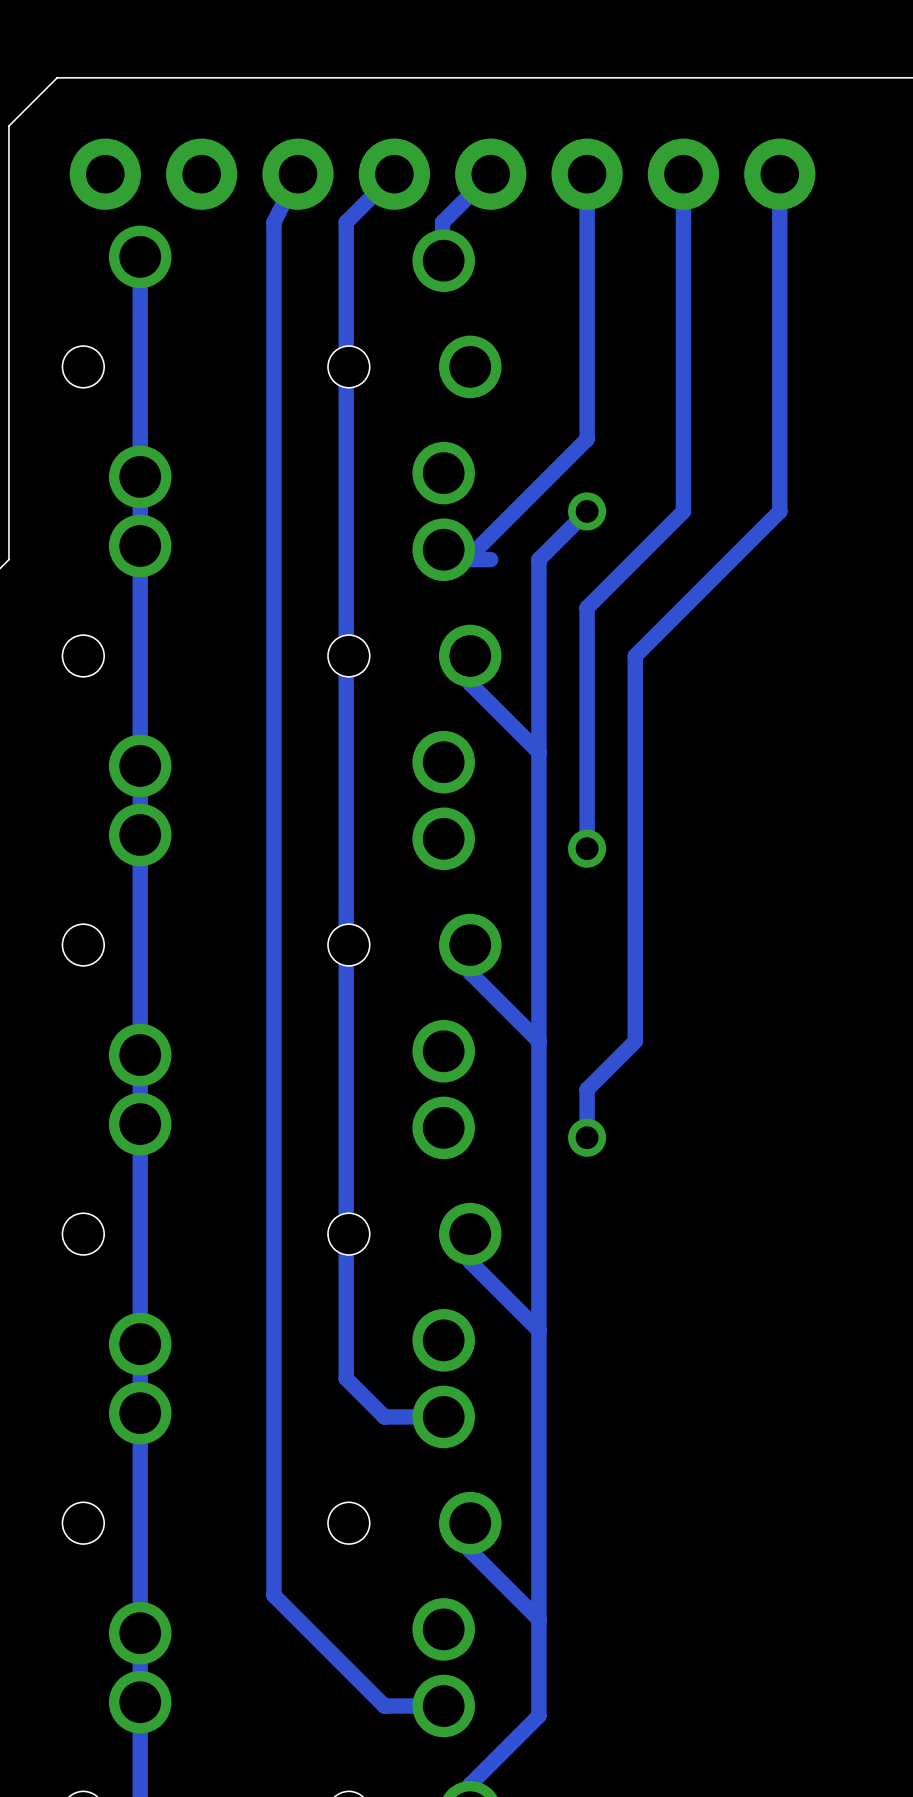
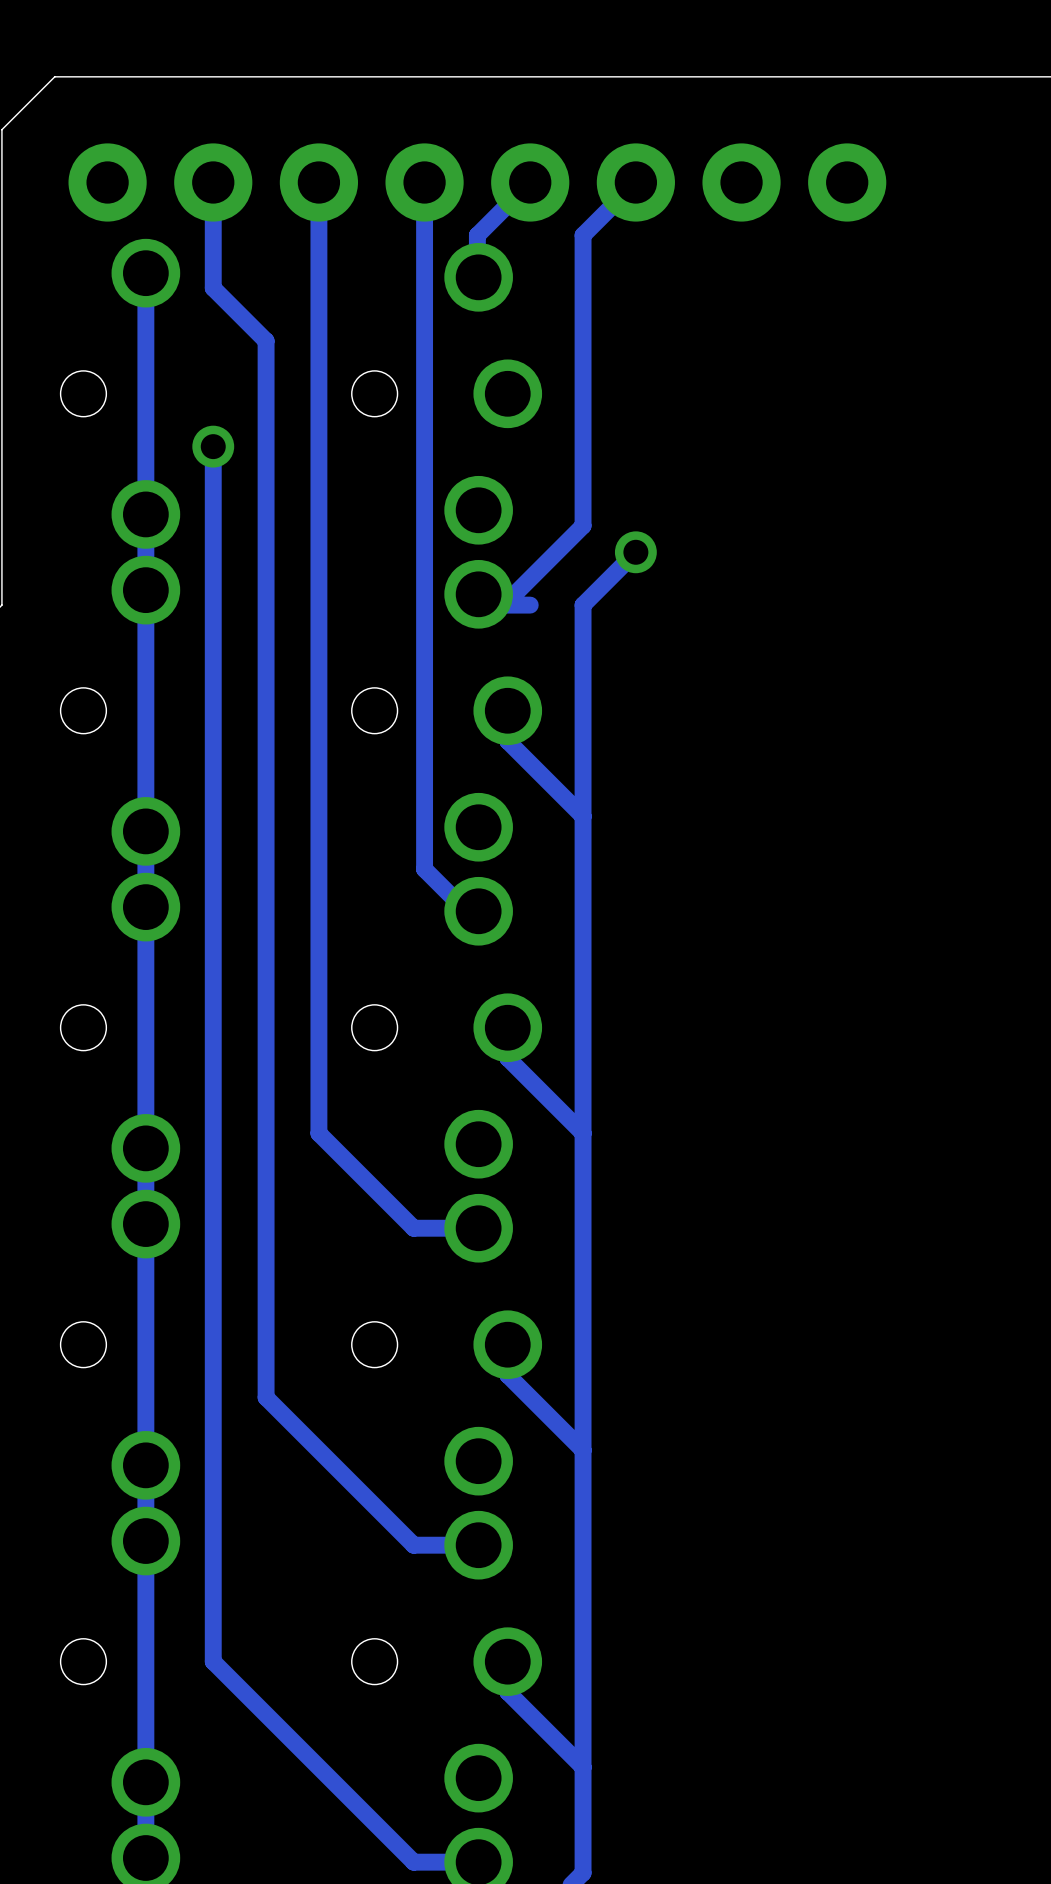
track: (298, 174) (273, 222) (273, 1595) -> (213, 446) (213, 1661) (292, 1740)
track: none -> (318, 182) (318, 1133) (413, 1228) (478, 1228)
track: (394, 174) (346, 222) (346, 1378) -> (213, 182) (213, 288) (266, 340) (266, 1397) (371, 1503)
track: none -> (424, 182) (424, 869) (466, 911) (478, 911)
track: (587, 174) (587, 439) (538, 487) -> (635, 182) (583, 235) (583, 525)
track: (683, 174) (683, 511) (587, 607) (587, 848) -> none
track: (779, 174) (779, 511) (635, 655) (635, 1041) (587, 1089) (587, 1137) -> none
via: none -> (213, 446)
via: (587, 848) -> none
via: (587, 1137) -> none

